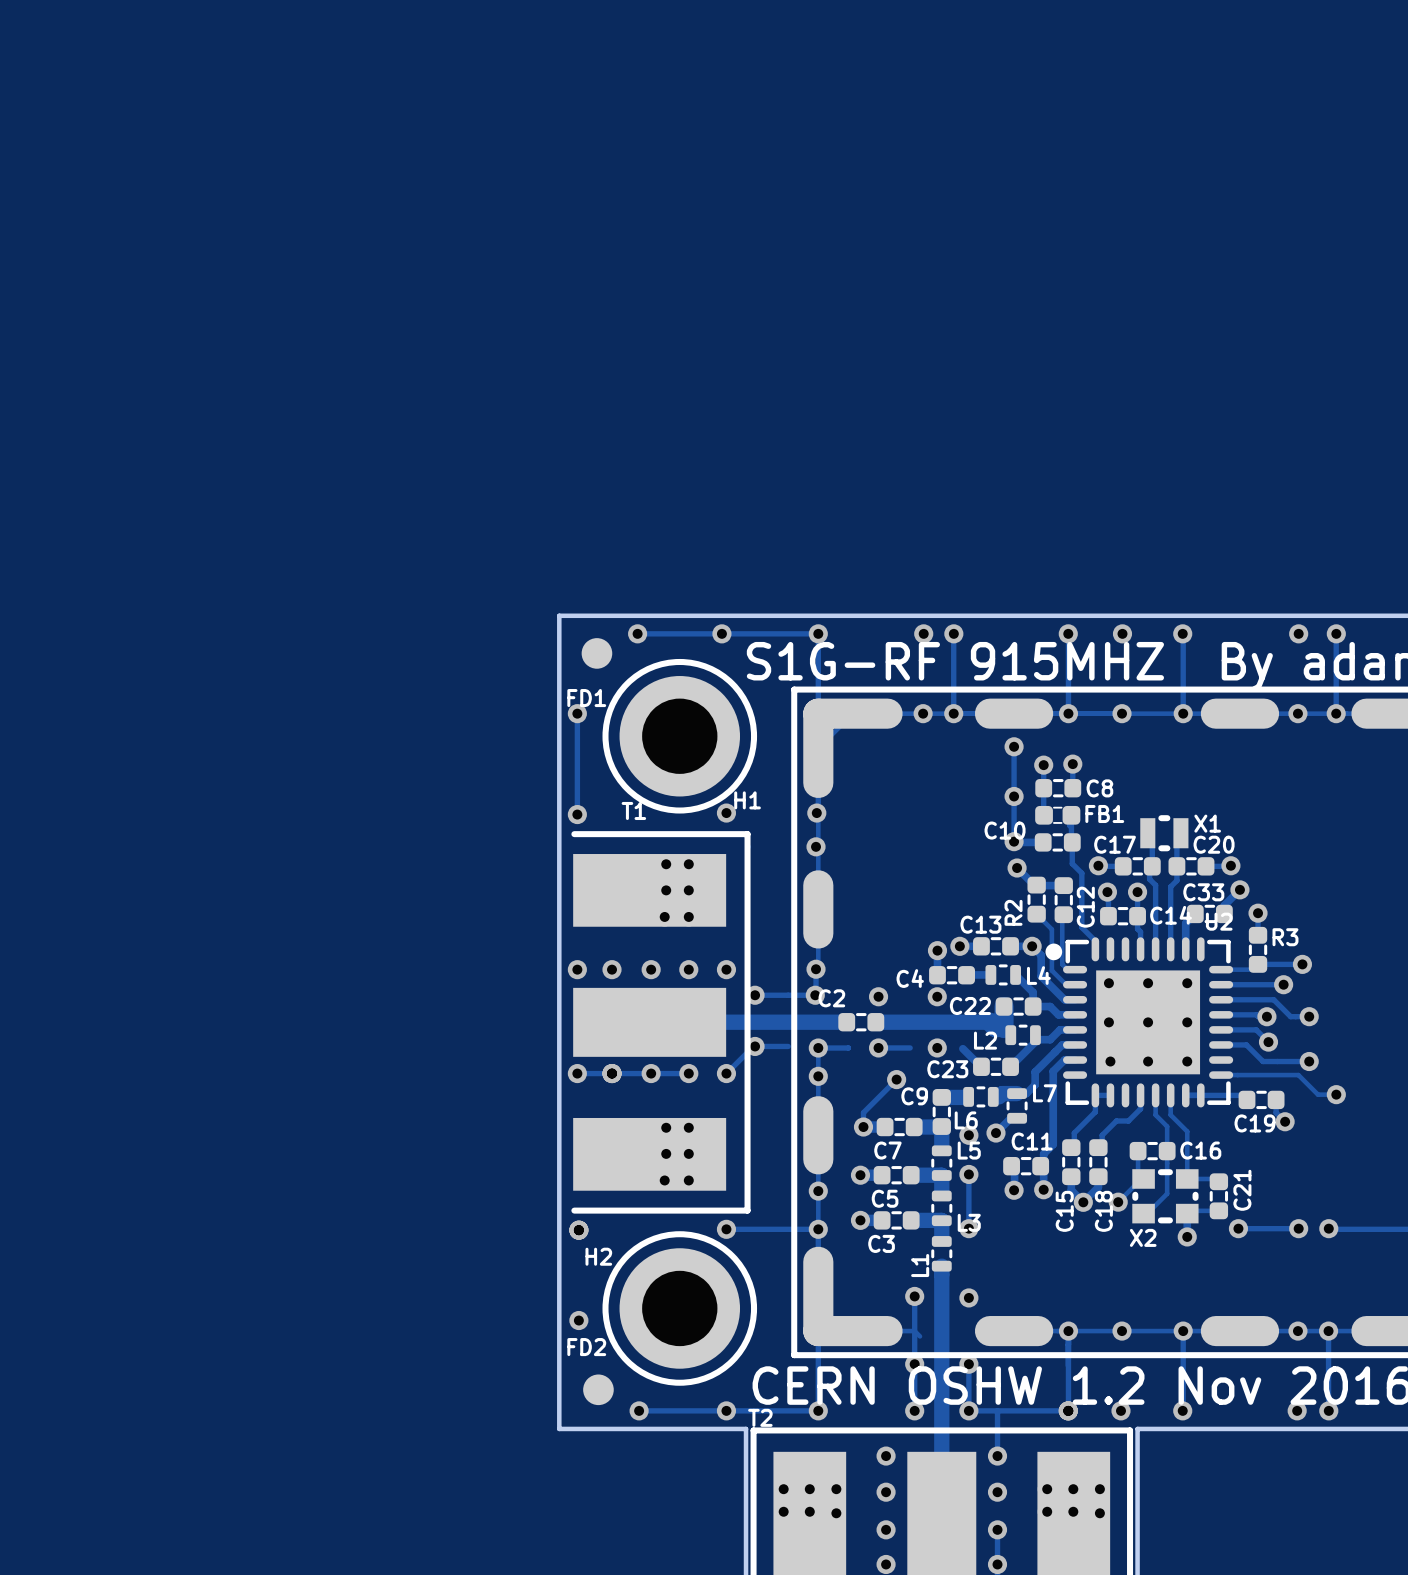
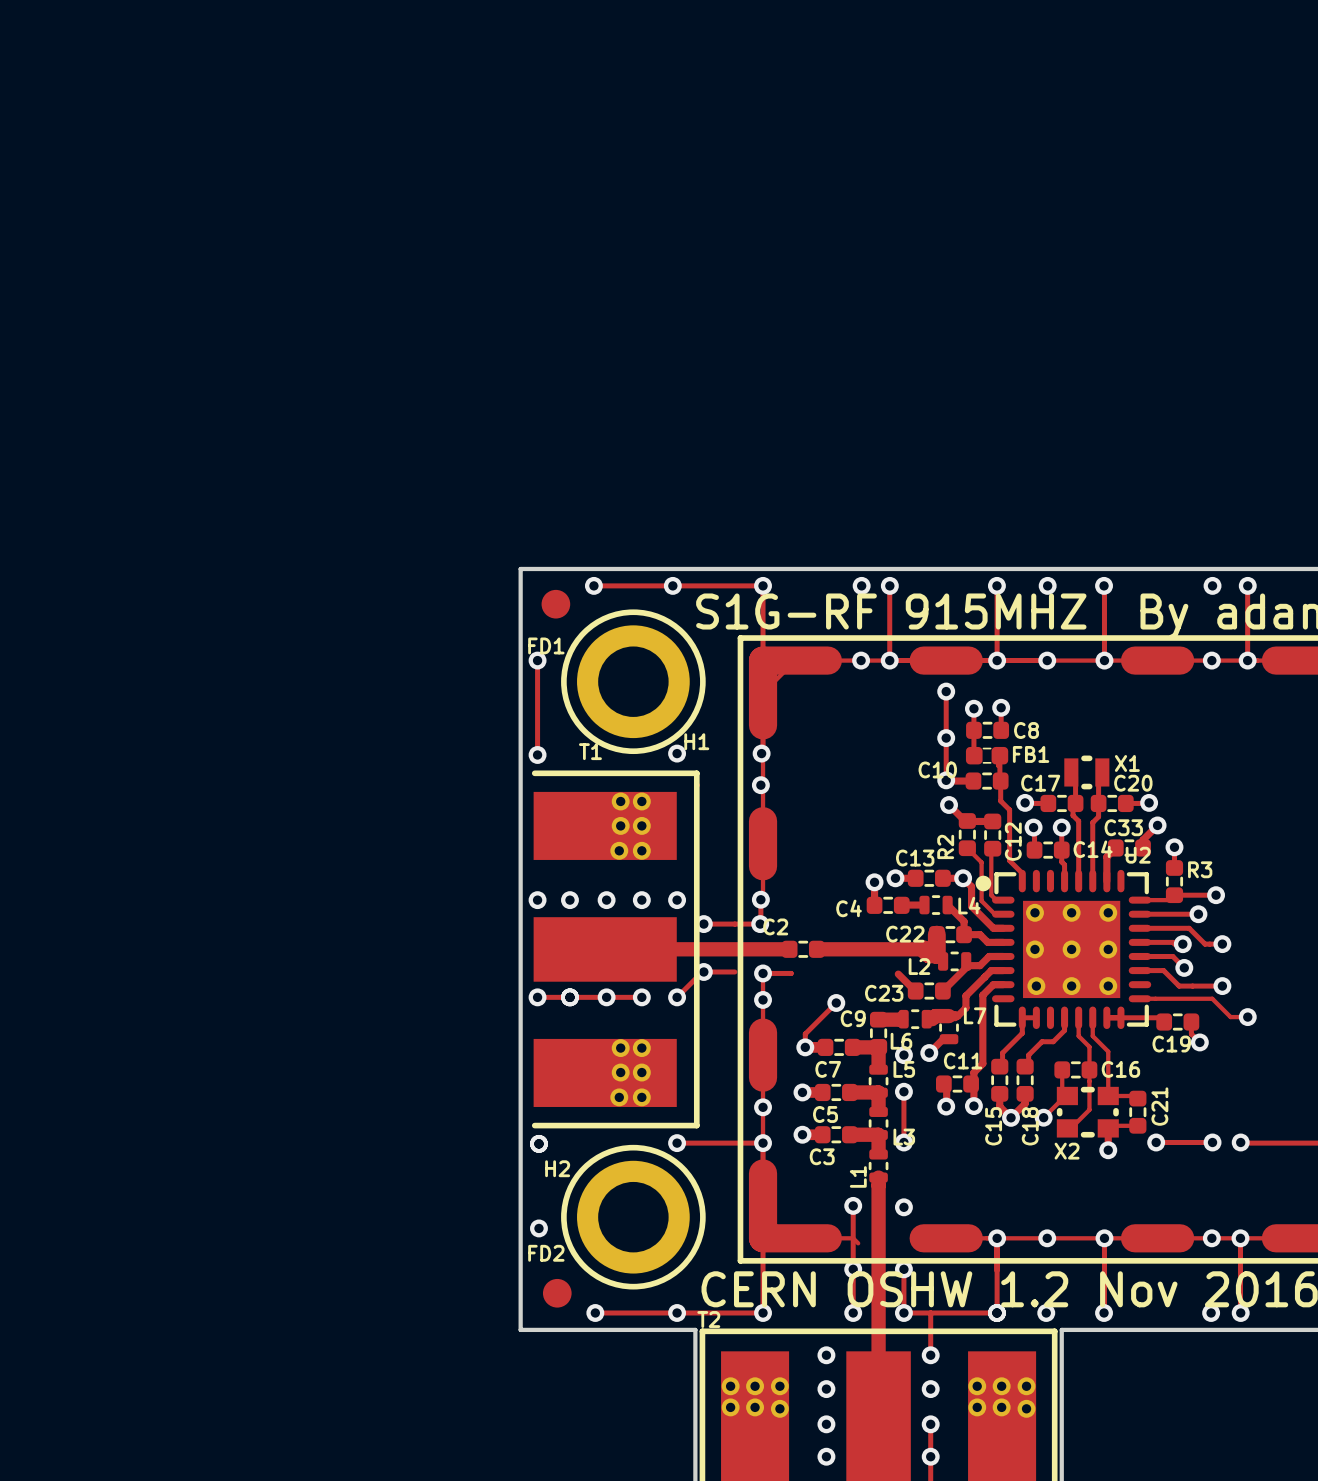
via: (878, 996) -> none
via: (937, 996) -> none
track: (878, 1047) (910, 1047) -> none
via: (878, 1047) -> none
via: (937, 1047) -> none

